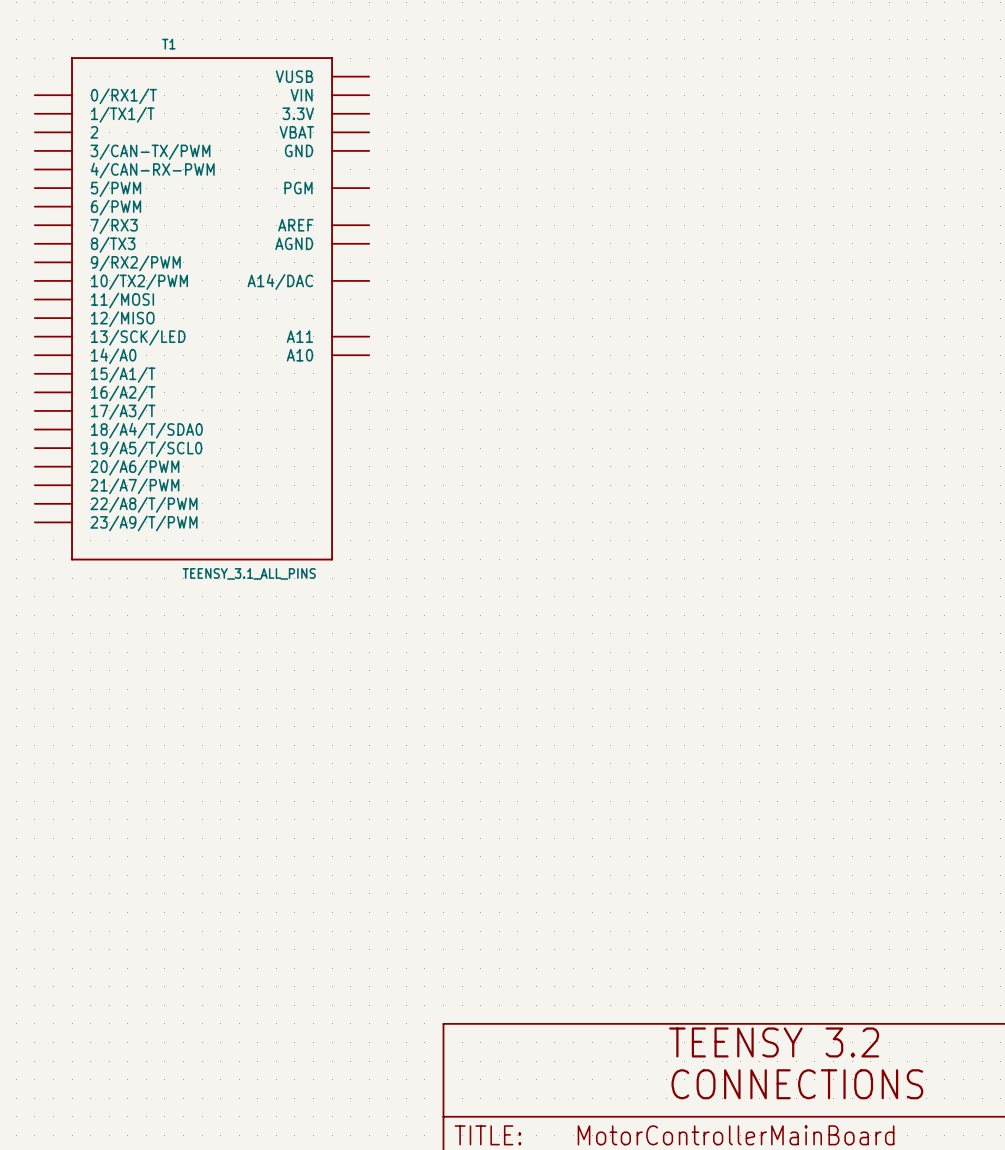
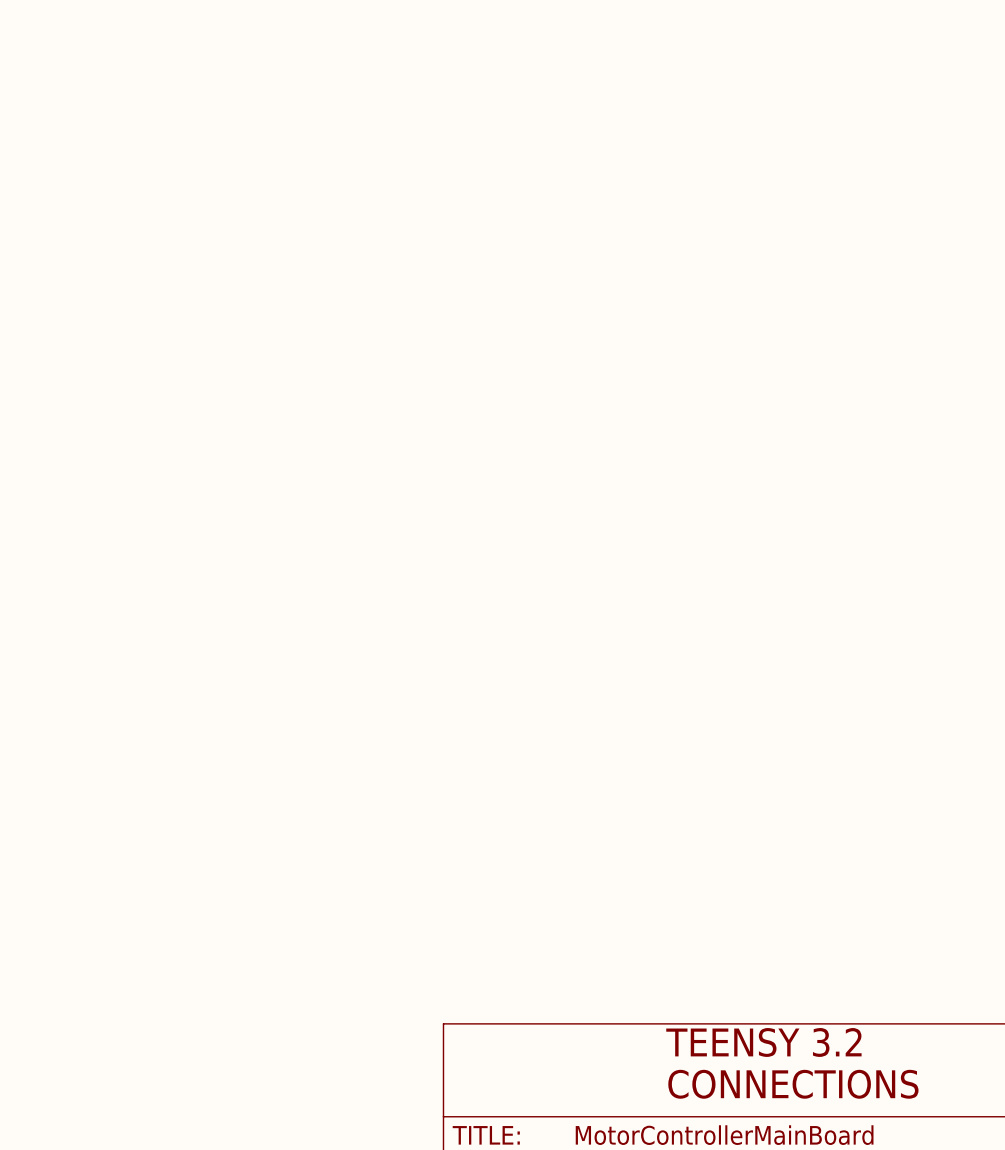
T1: TEENSY_3.1_ALL_PINS (202, 308) -> none

